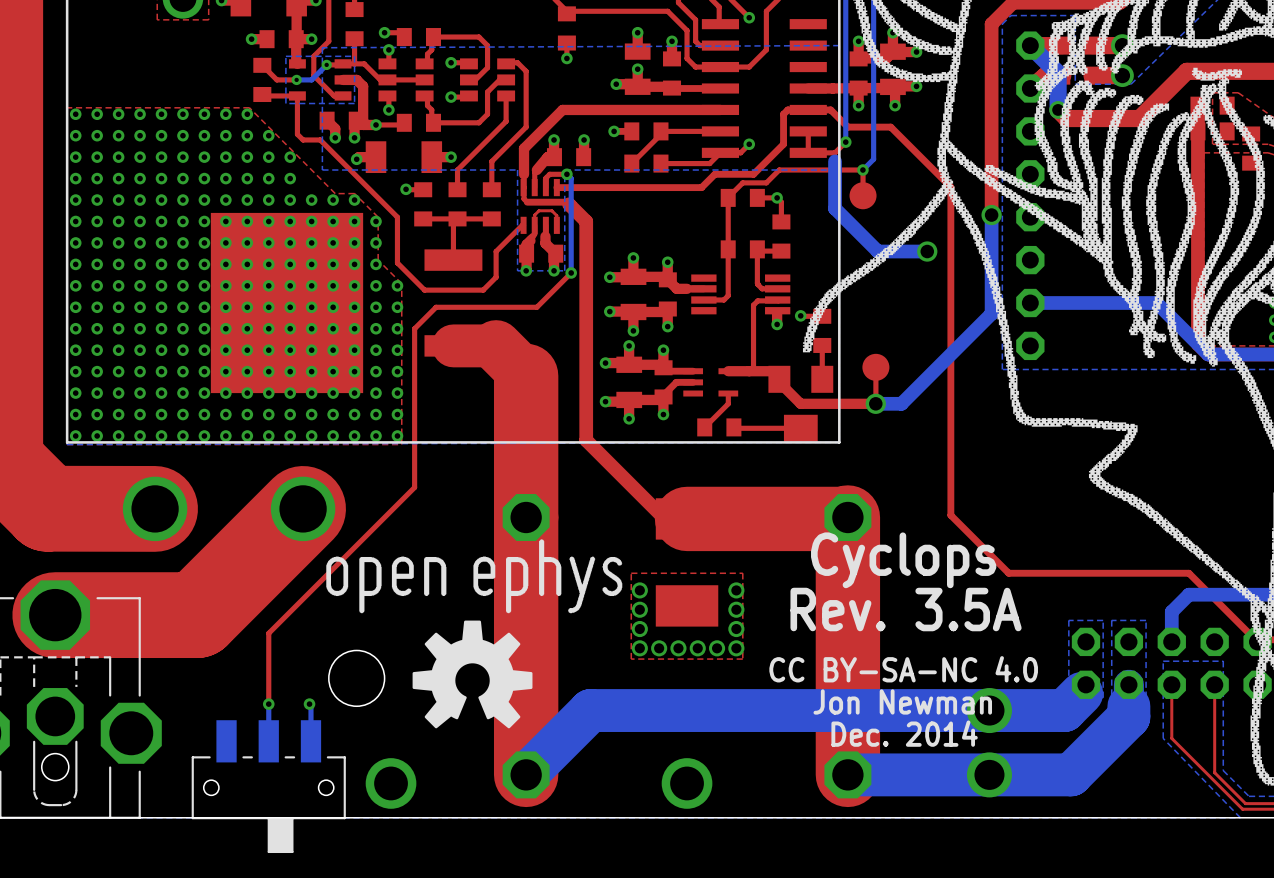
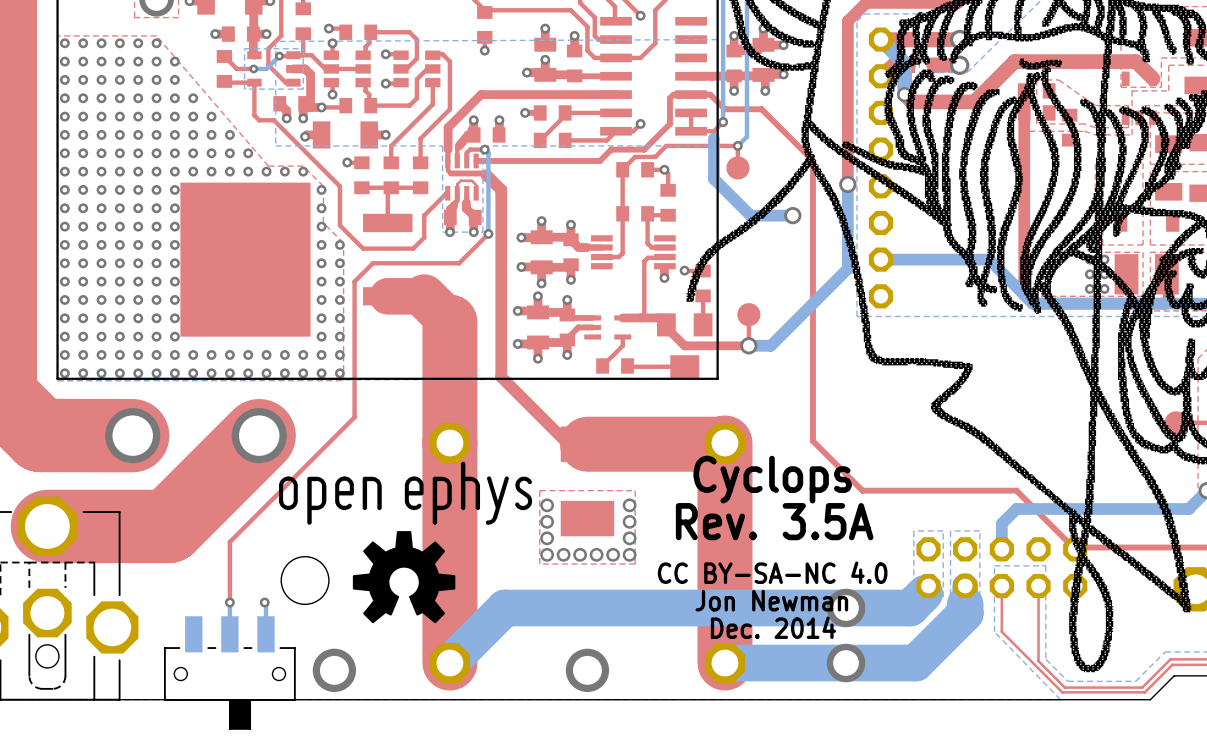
via: none -> (64, 43)
via: none -> (83, 43)
via: none -> (101, 43)
via: none -> (119, 43)
via: none -> (138, 43)
via: none -> (156, 43)
via: none -> (64, 61)
via: none -> (83, 61)
via: none -> (101, 61)
via: none -> (119, 61)
via: none -> (138, 61)
via: none -> (156, 61)
via: none -> (174, 61)
via: none -> (64, 79)
via: none -> (83, 79)
via: none -> (101, 79)
via: none -> (119, 79)
via: none -> (138, 79)
via: none -> (156, 79)
via: none -> (174, 79)
top zone outline: (67, 107) (249, 107) (335, 193) -> (57, 92) (57, 35) (156, 35) (268, 166) (286, 166)
via: (247, 114) -> none
via: (268, 135) -> none
via: (290, 157) -> none
via: (225, 221) -> none
via: (247, 221) -> none
via: (268, 221) -> none
via: (290, 221) -> none
via: (311, 221) -> none
via: (333, 221) -> none
via: (354, 221) -> none
via: (225, 242) -> none
via: (247, 242) -> none
via: (268, 242) -> none
via: (290, 242) -> none
via: (311, 242) -> none
via: (333, 242) -> none
via: (354, 242) -> none
via: (225, 264) -> none
via: (247, 264) -> none
via: (268, 264) -> none
via: (290, 264) -> none
via: (311, 264) -> none
via: (333, 264) -> none
via: (354, 264) -> none
via: (225, 285) -> none
via: (247, 285) -> none
via: (268, 285) -> none
via: (290, 285) -> none
via: (311, 285) -> none
via: (333, 285) -> none
via: (354, 285) -> none
via: (225, 307) -> none
via: (247, 307) -> none
via: (268, 307) -> none
via: (290, 307) -> none
via: (311, 307) -> none
via: (333, 307) -> none
via: (354, 307) -> none
via: (225, 328) -> none
via: (247, 328) -> none
via: (268, 328) -> none
via: (290, 328) -> none
via: (311, 328) -> none
via: (333, 328) -> none
via: (354, 328) -> none
via: (225, 350) -> none
via: (247, 350) -> none
via: (268, 350) -> none
via: (290, 350) -> none
via: (311, 350) -> none
via: (333, 350) -> none
via: (354, 350) -> none
via: (225, 371) -> none
via: (247, 371) -> none
via: (268, 371) -> none
via: (290, 371) -> none
via: (311, 371) -> none
via: (333, 371) -> none
via: (354, 371) -> none
via: (225, 393) -> none
via: (247, 393) -> none
via: (268, 393) -> none
via: (290, 393) -> none
via: (311, 393) -> none
via: (333, 393) -> none
via: (354, 393) -> none

